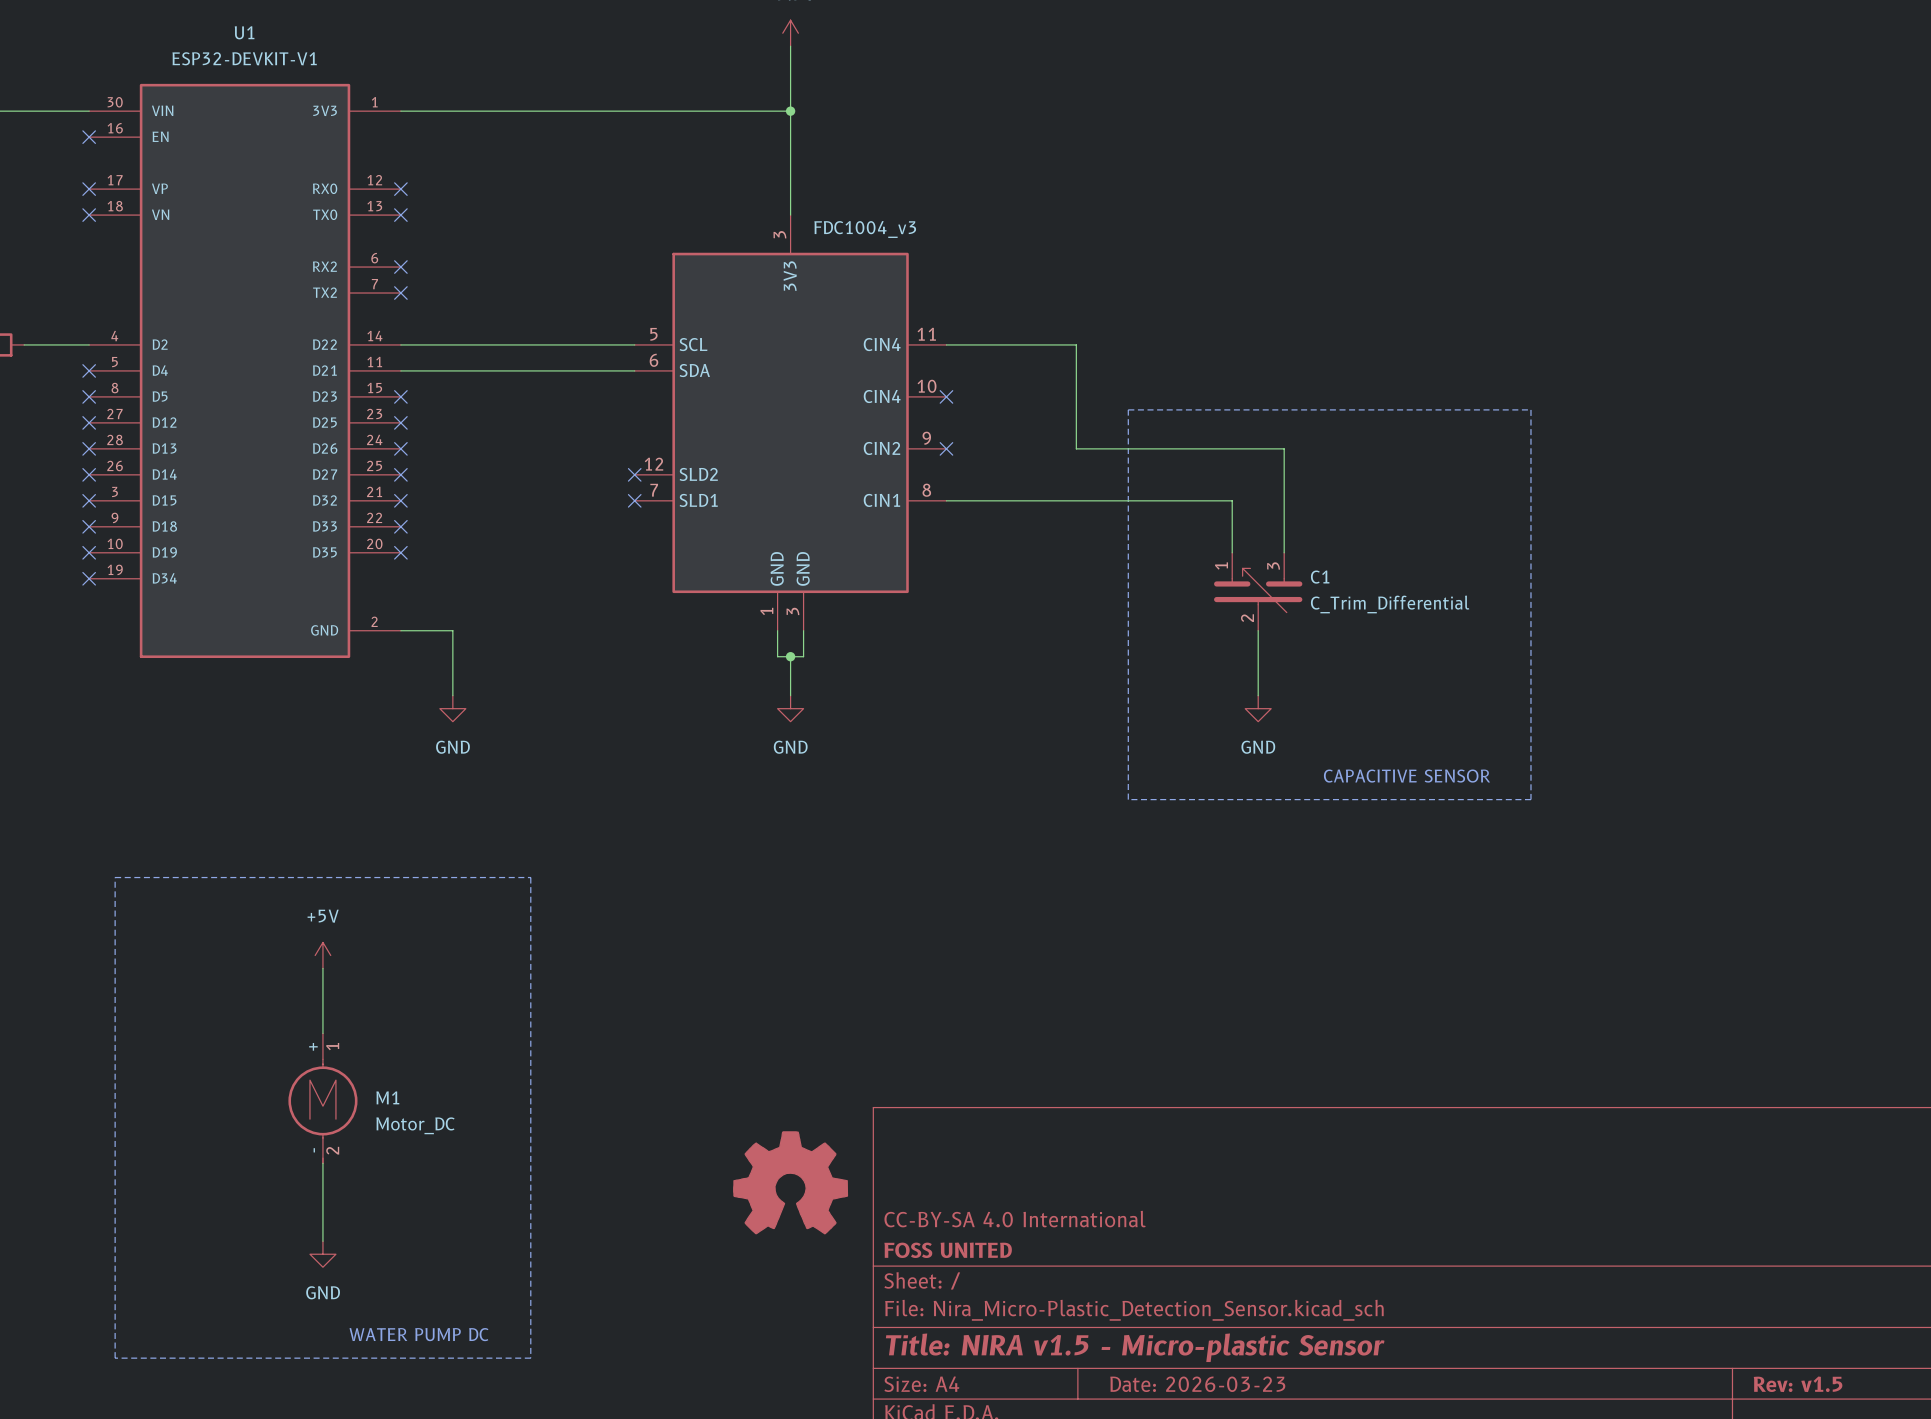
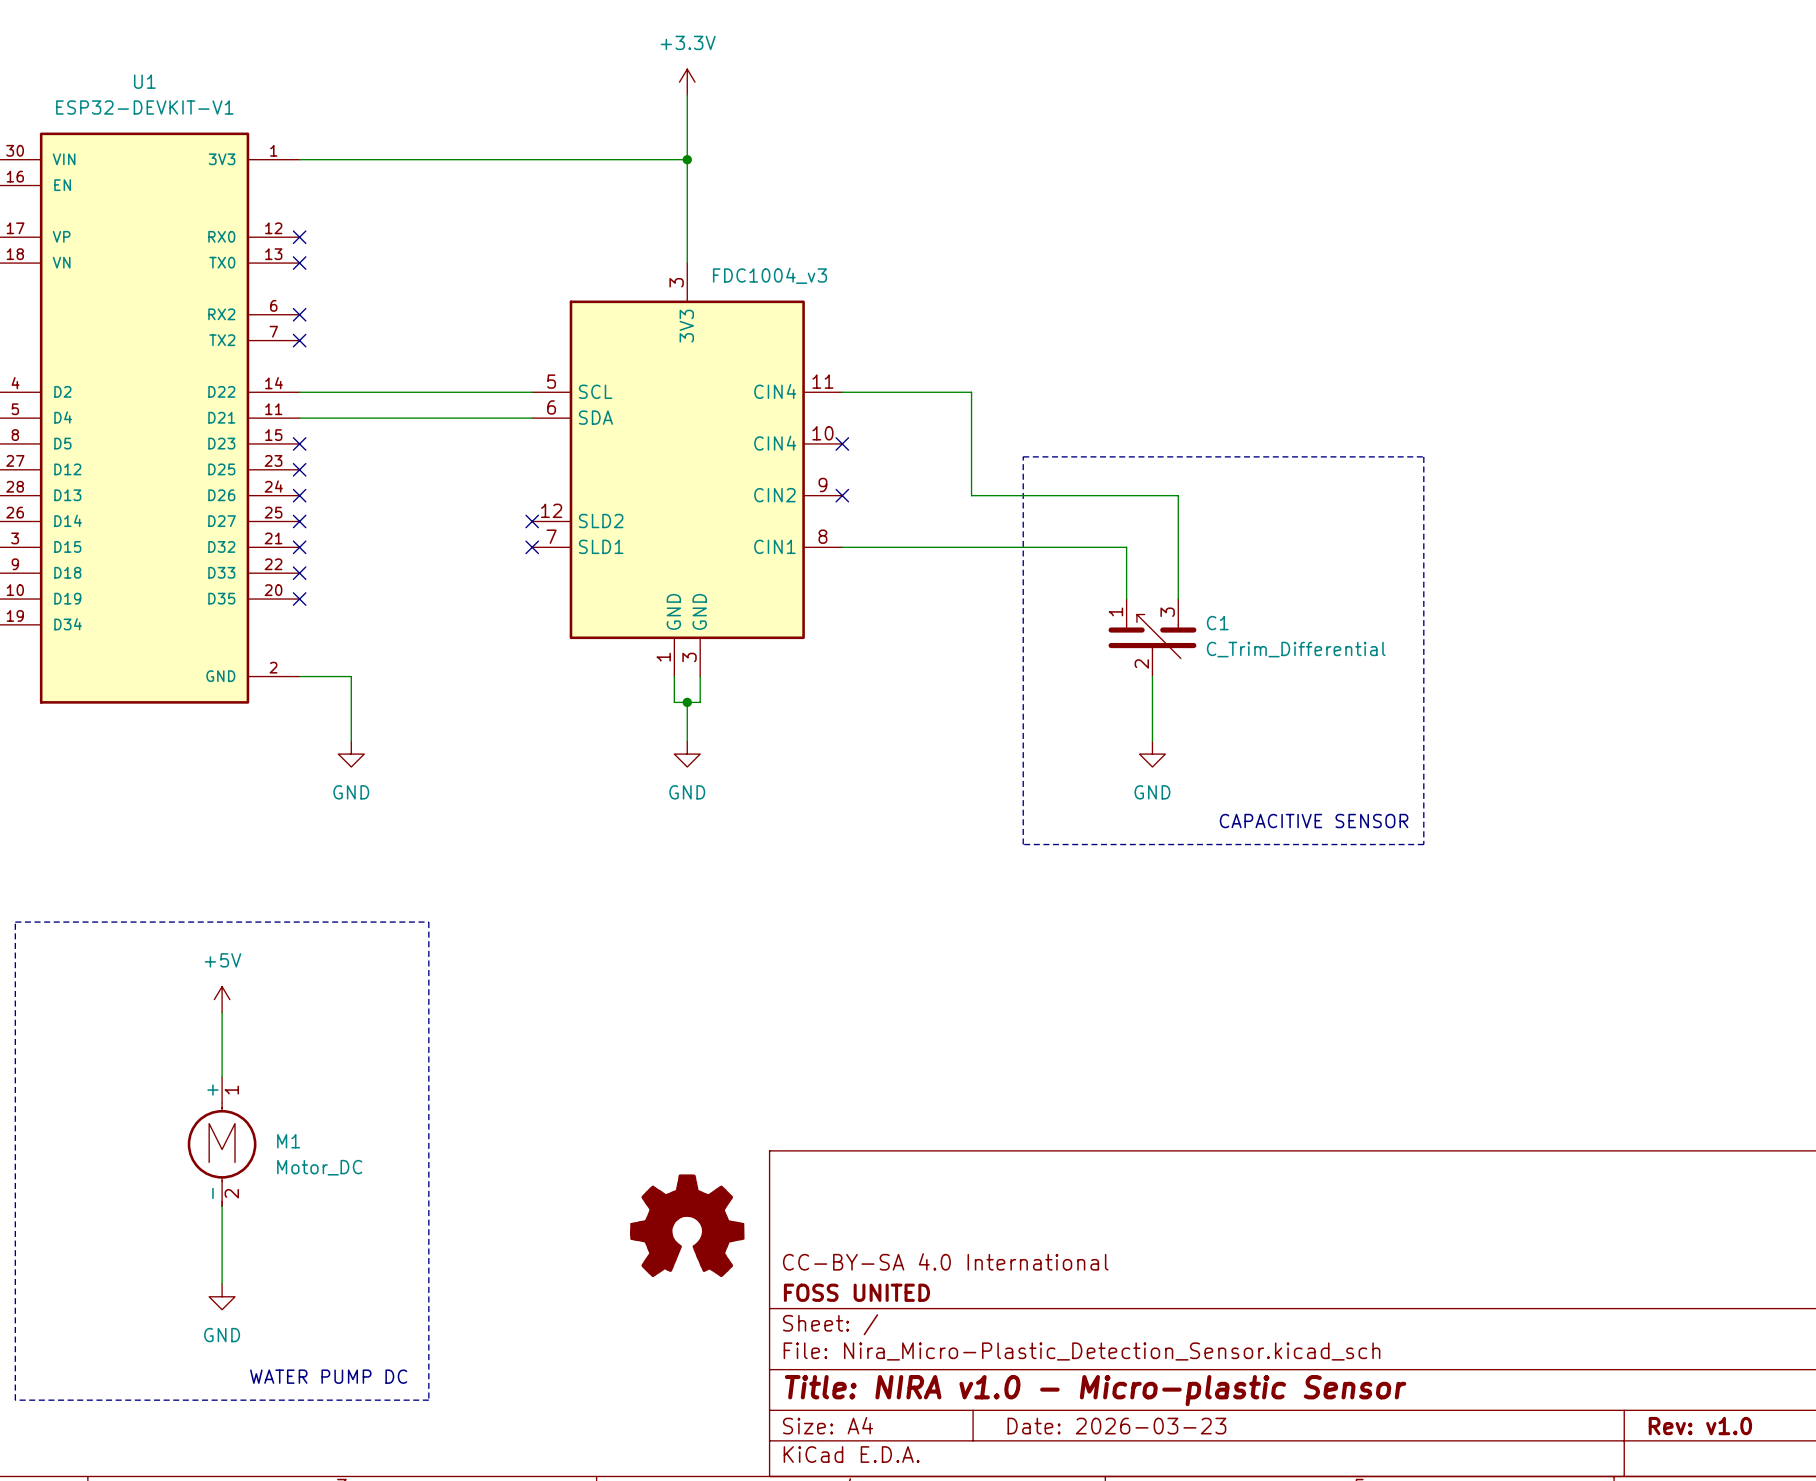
title block: Title: NIRA v1.5 - Micro-plastic Sensor (1135, 1347) -> Title: NIRA v1.0 - Micro-plastic Sensor (1095, 1390)
title block: Rev: v1.5 (1798, 1384) -> Rev: v1.0 (1700, 1426)

